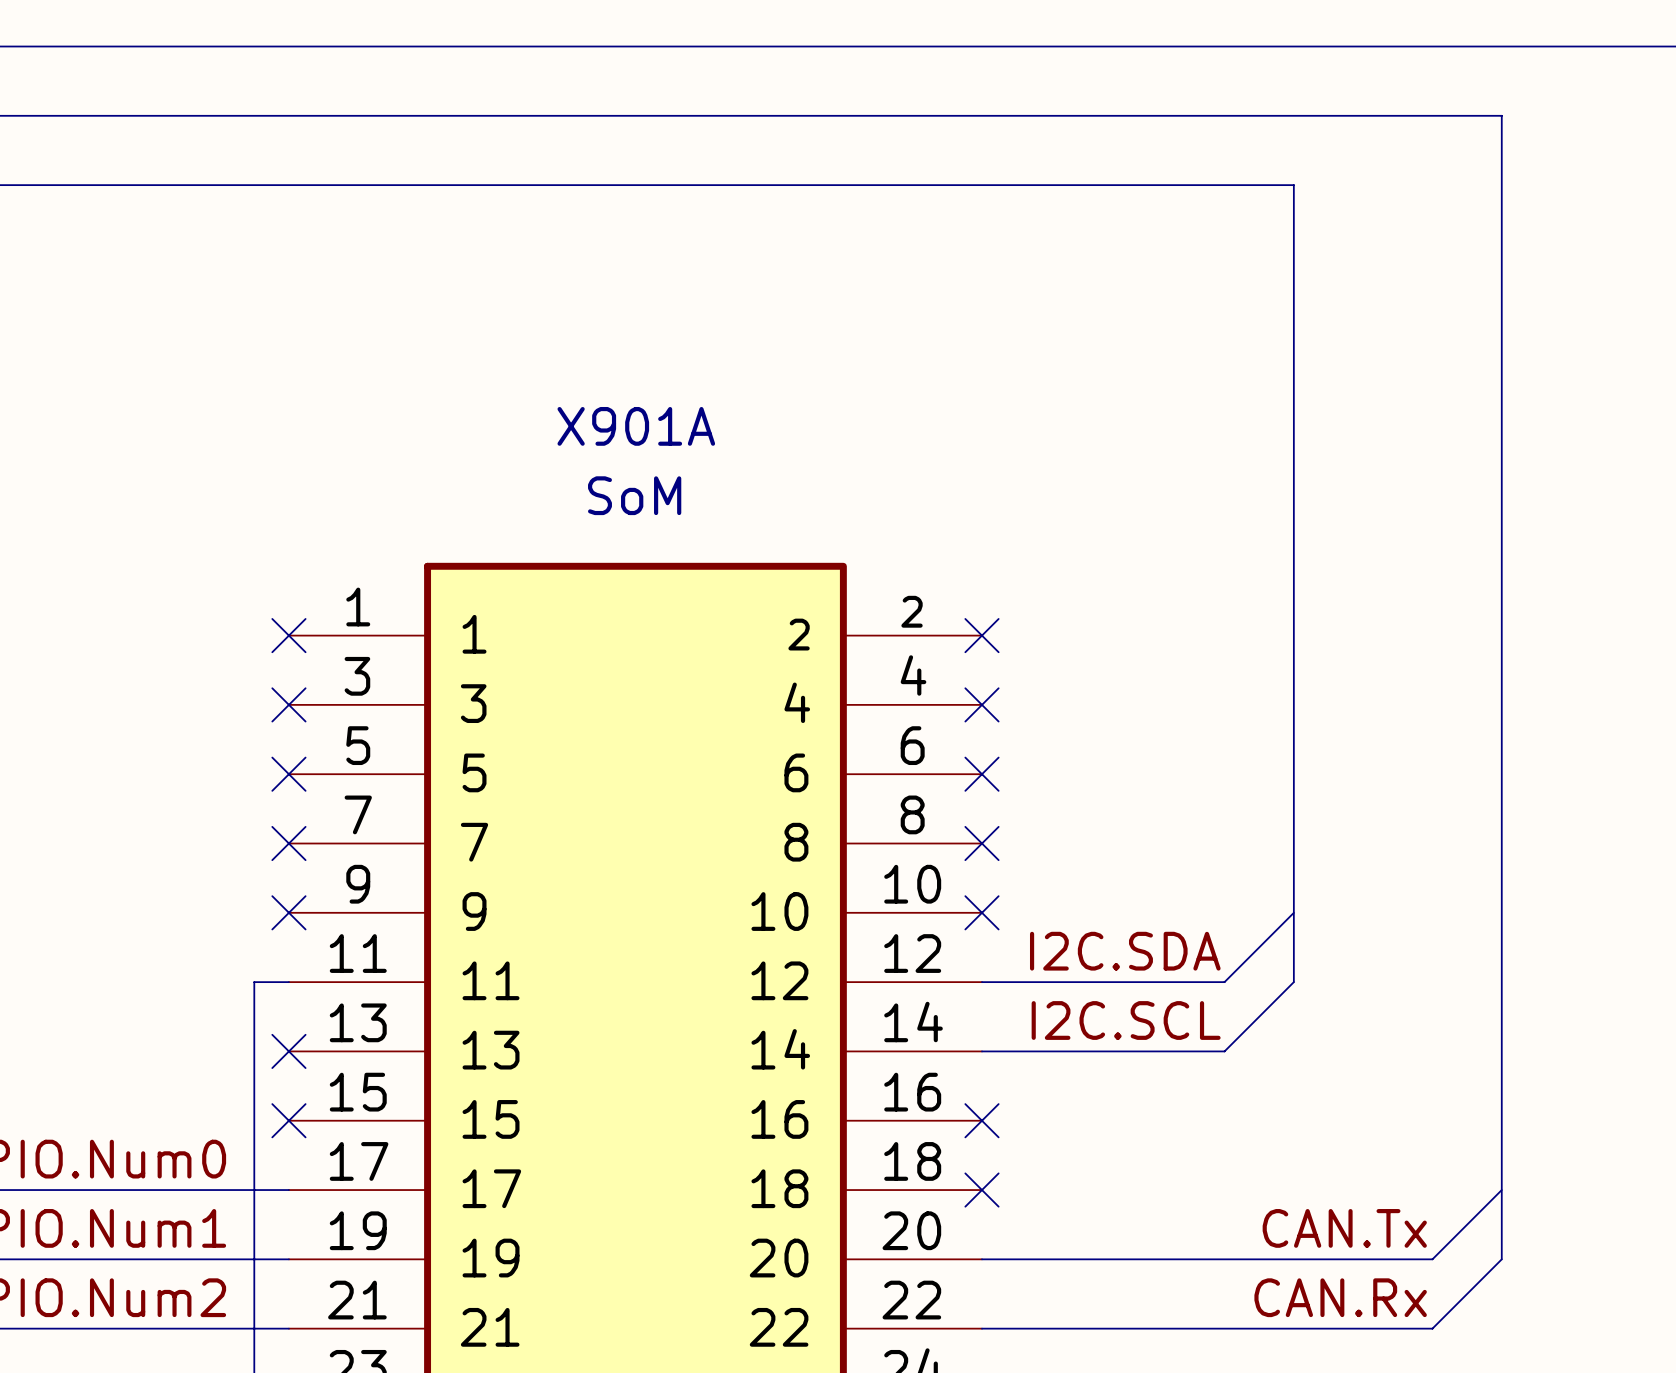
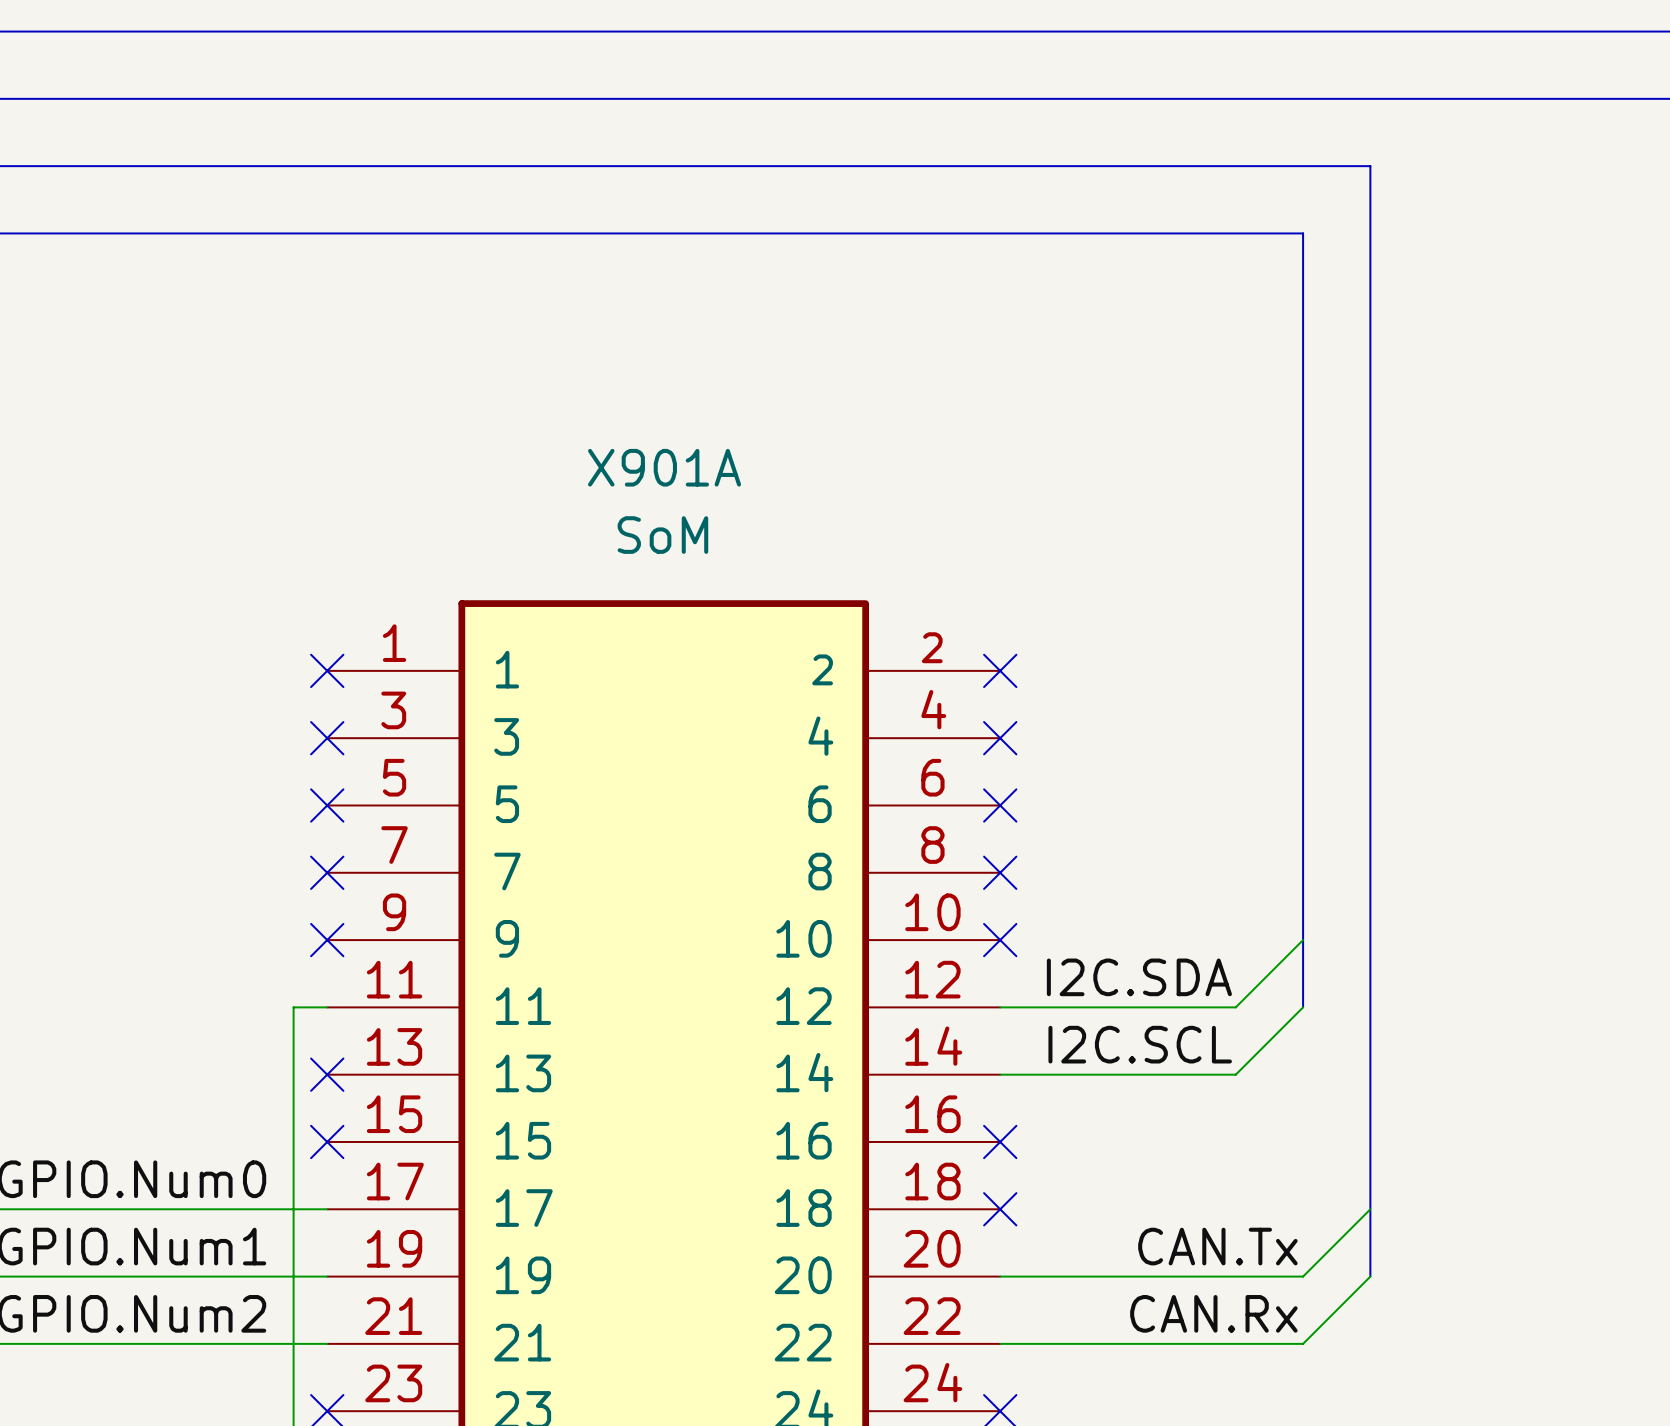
bus: (1363, 115) (1501, 115) (1501, 1259) -> (1370, 166) (1370, 1276)
wire: (1501, 1190) (1432, 1259) (1293, 1259) -> (1370, 1209) (1303, 1276)
label position: CAN.Tx (1344, 1228) -> CAN.Tx (1217, 1246)
wire: (1501, 1259) (1432, 1328) (1293, 1328) -> (1370, 1276) (1303, 1343)
label position: CAN.Rx (1340, 1297) -> CAN.Rx (1213, 1313)

